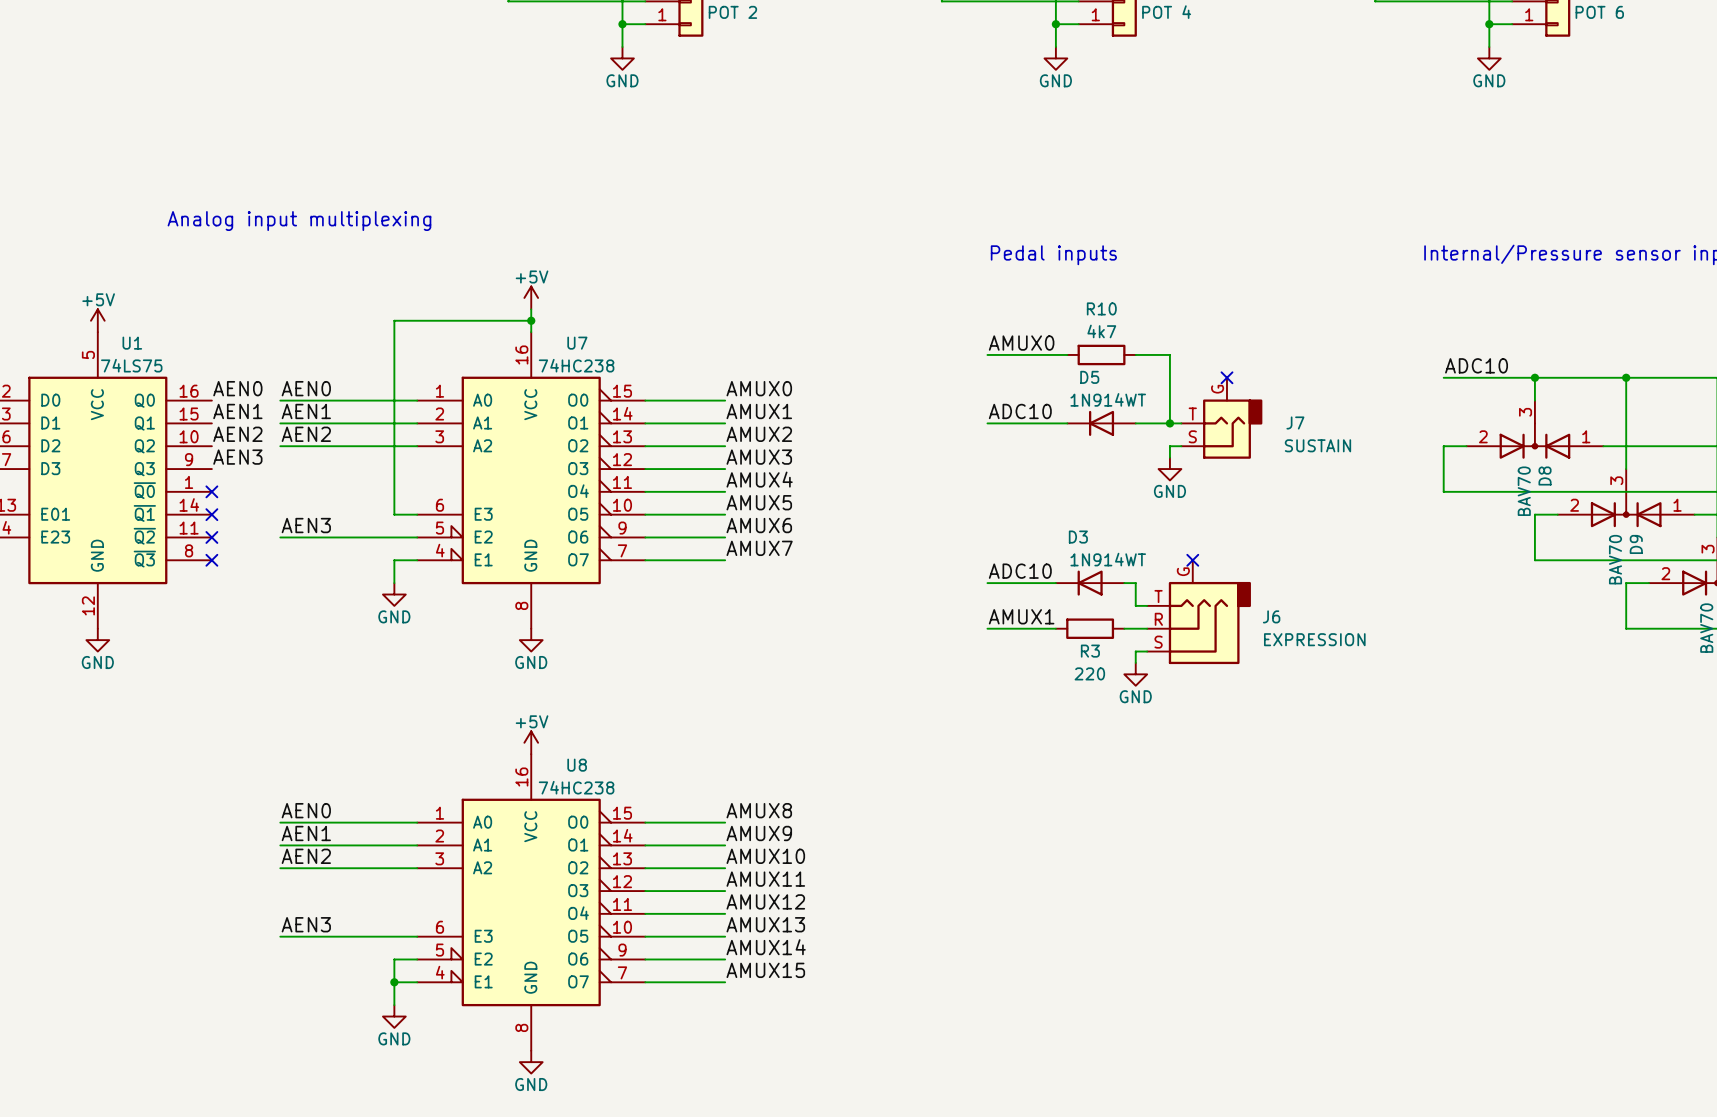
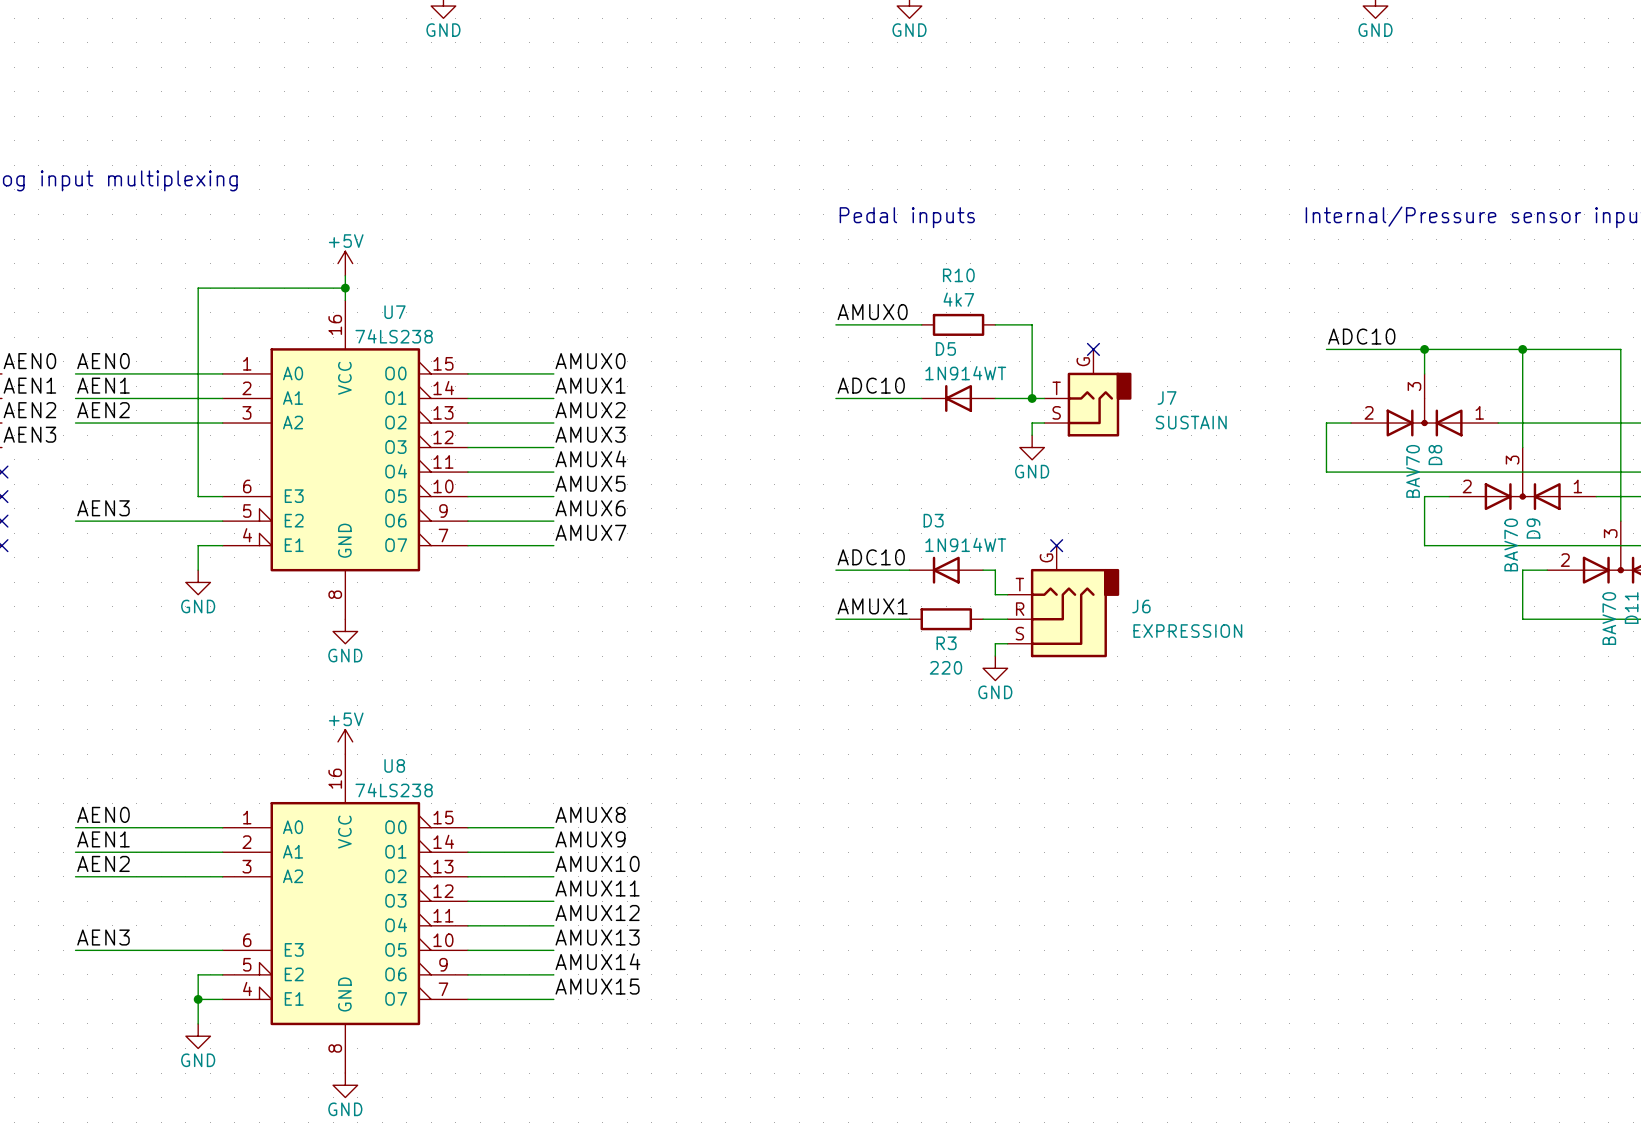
U7 value: 74HC238 (576, 365) -> 74LS238 (394, 336)
U8 value: 74HC238 (576, 787) -> 74LS238 (394, 790)

